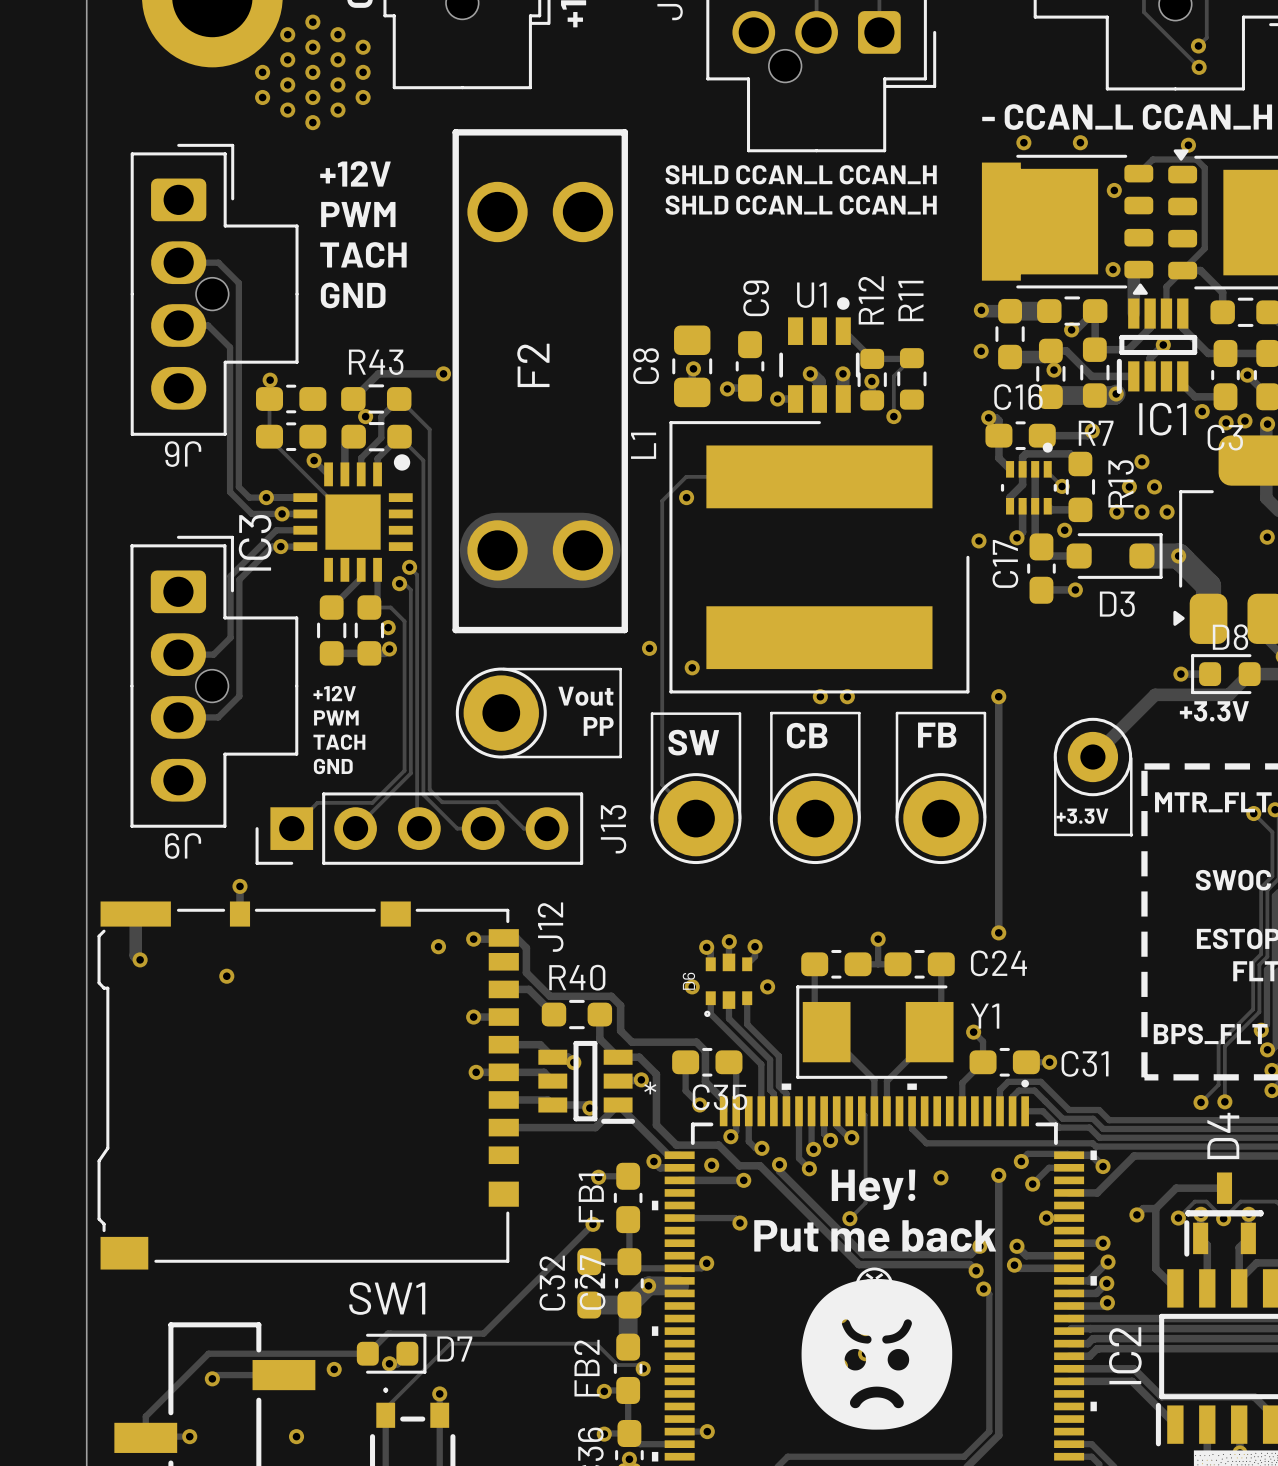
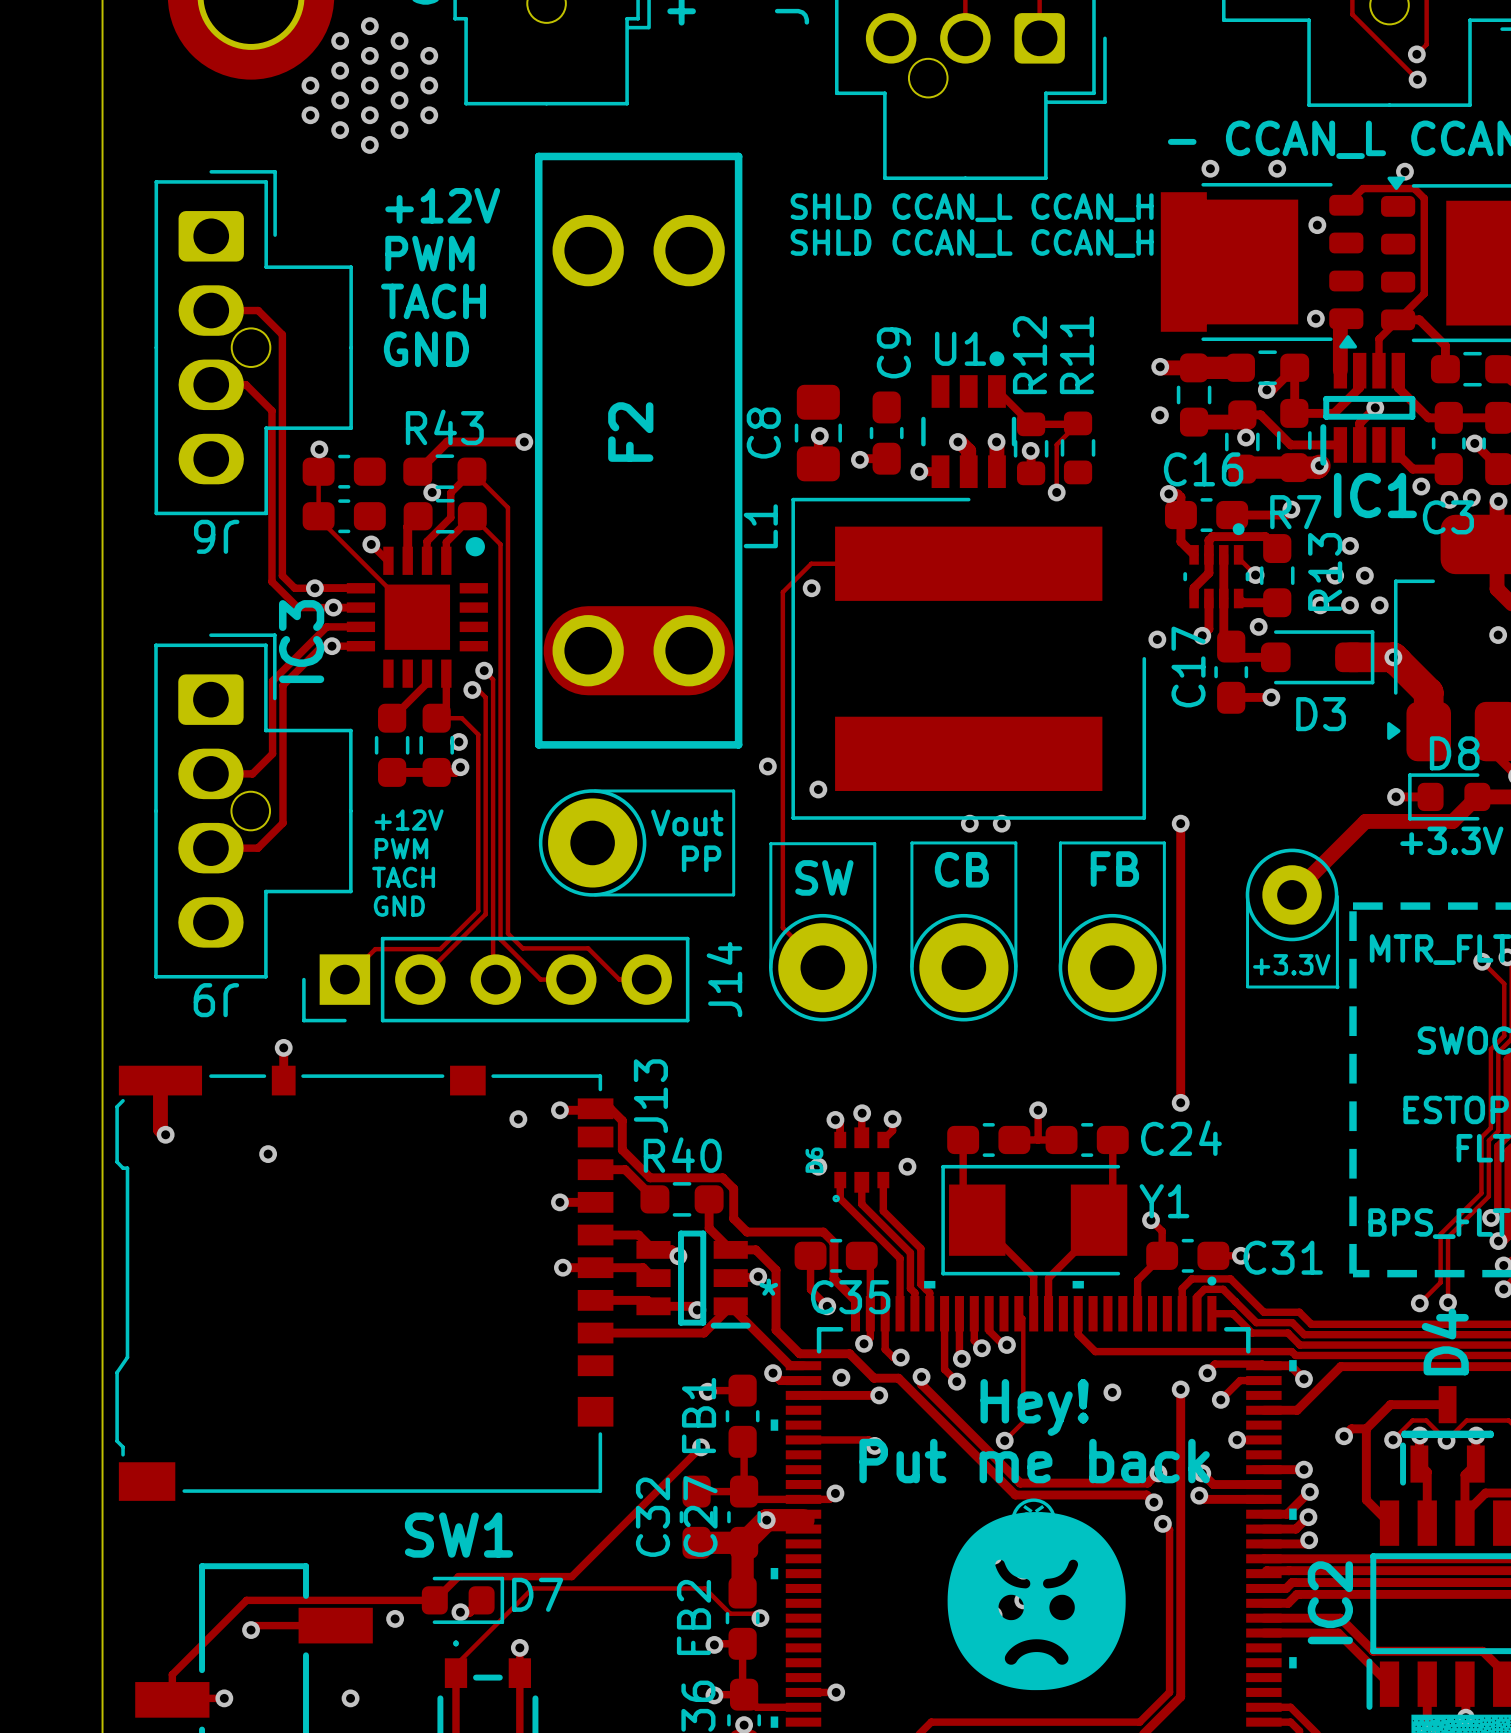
J13 name: J13 (613, 829) -> J14 (724, 979)
J12 name: J12 (550, 927) -> J13 (650, 1096)

